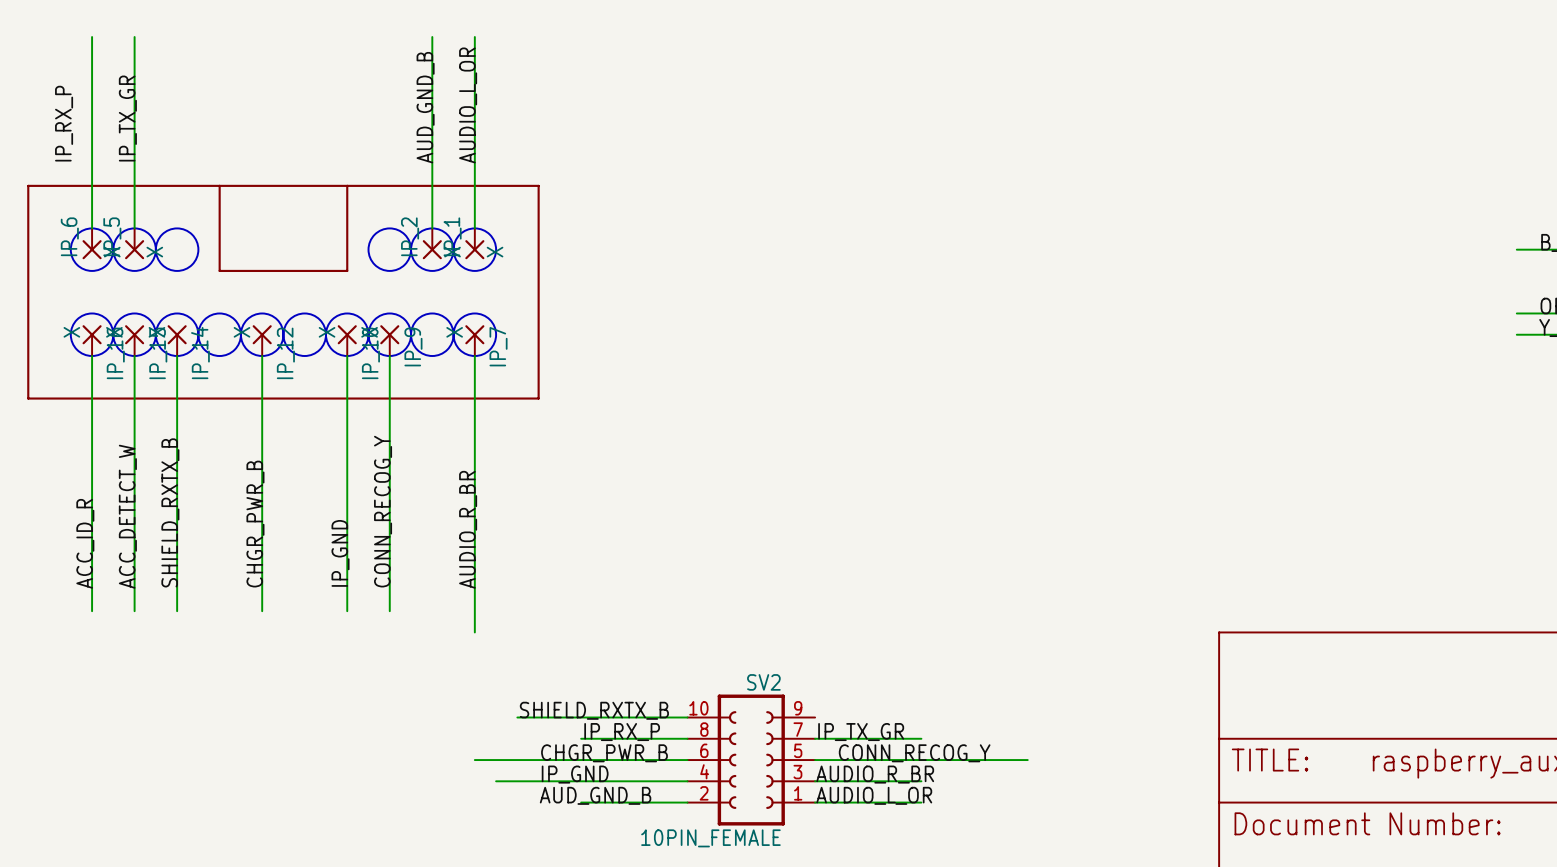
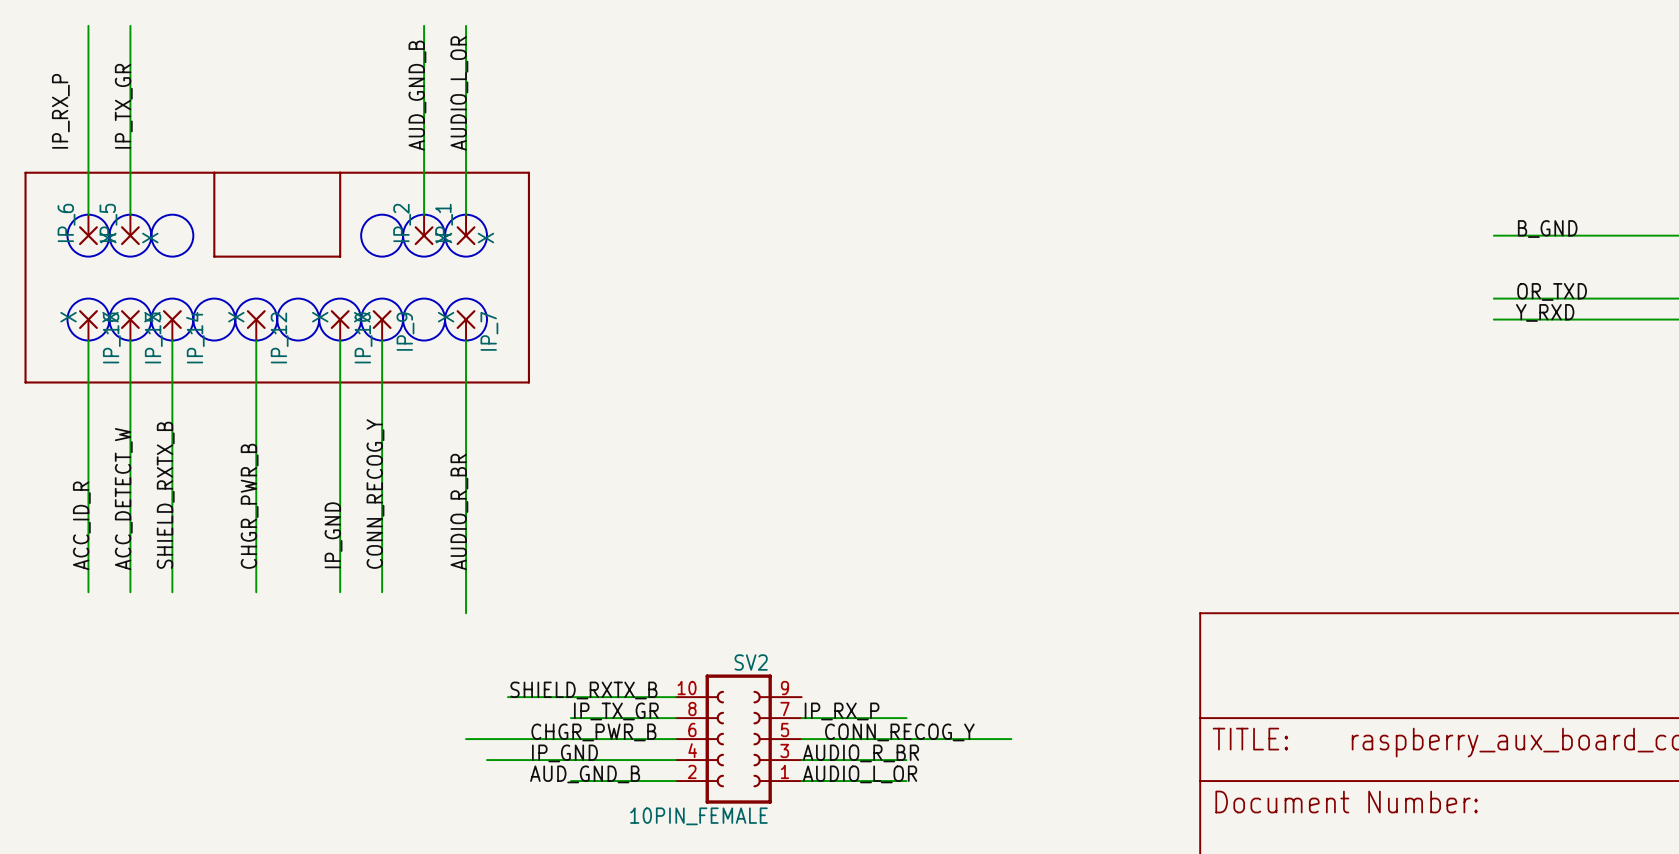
label: IP_RX_P (622, 732) -> IP_TX_GR (616, 711)
label: IP_TX_GR (861, 732) -> IP_RX_P (842, 711)

